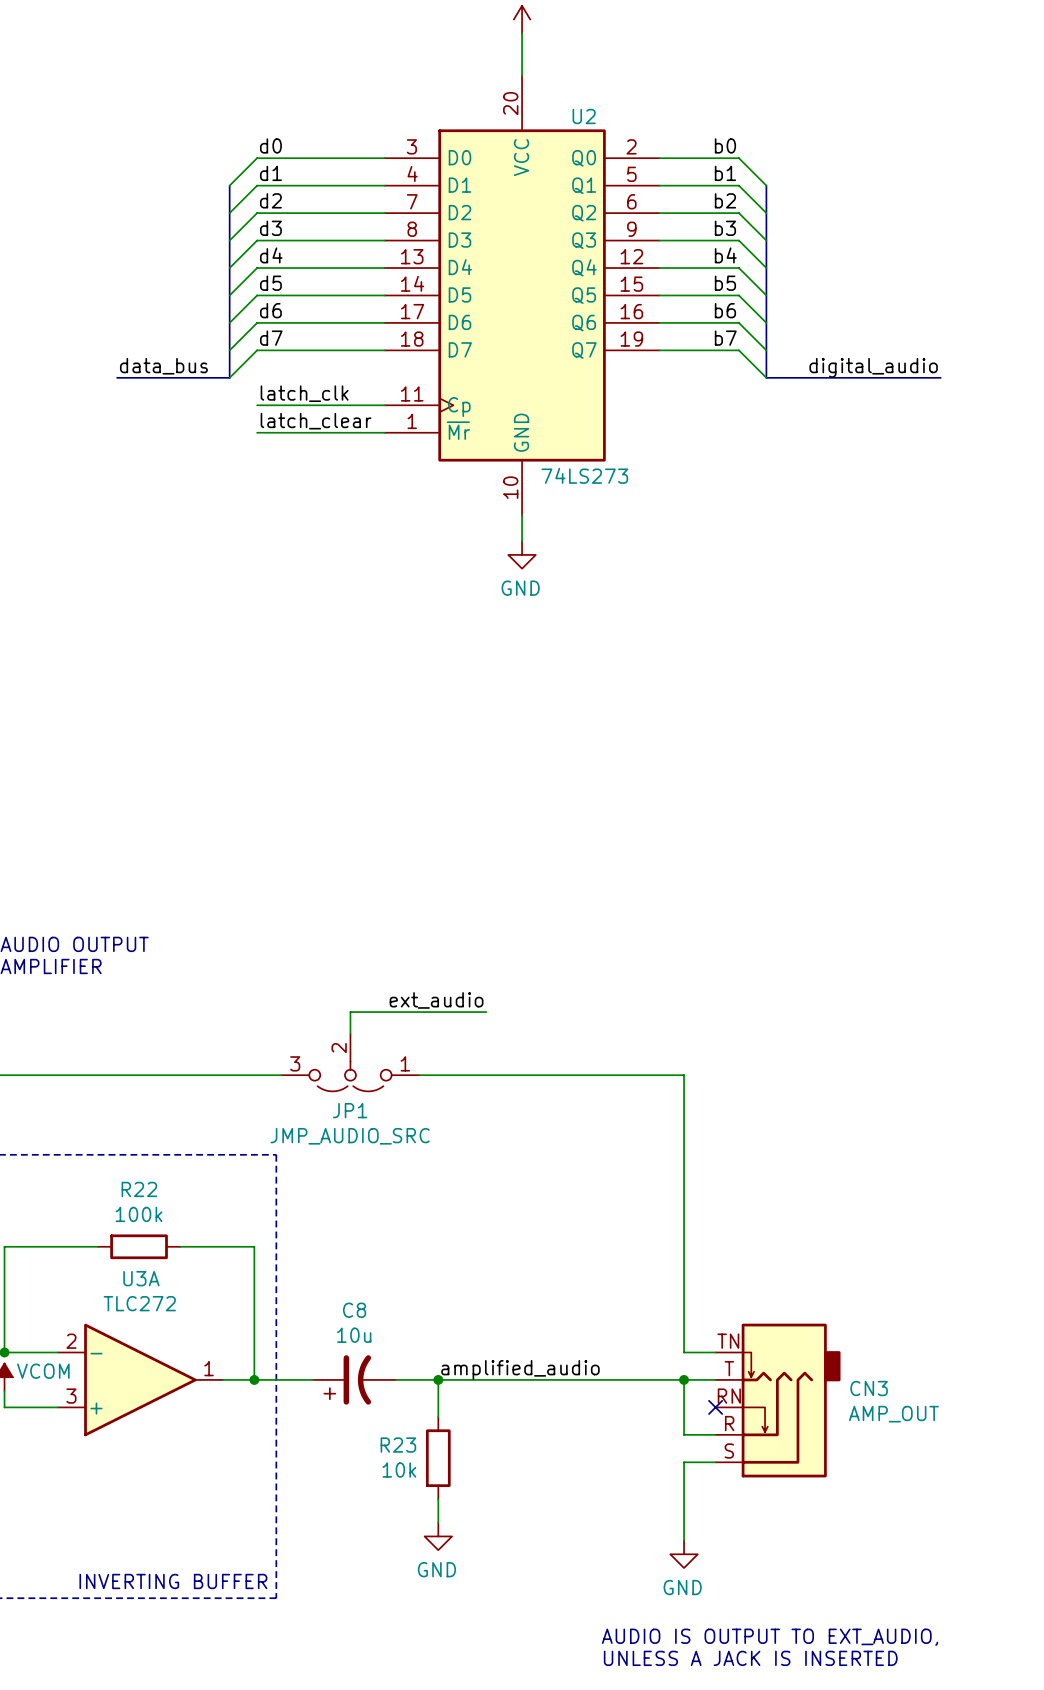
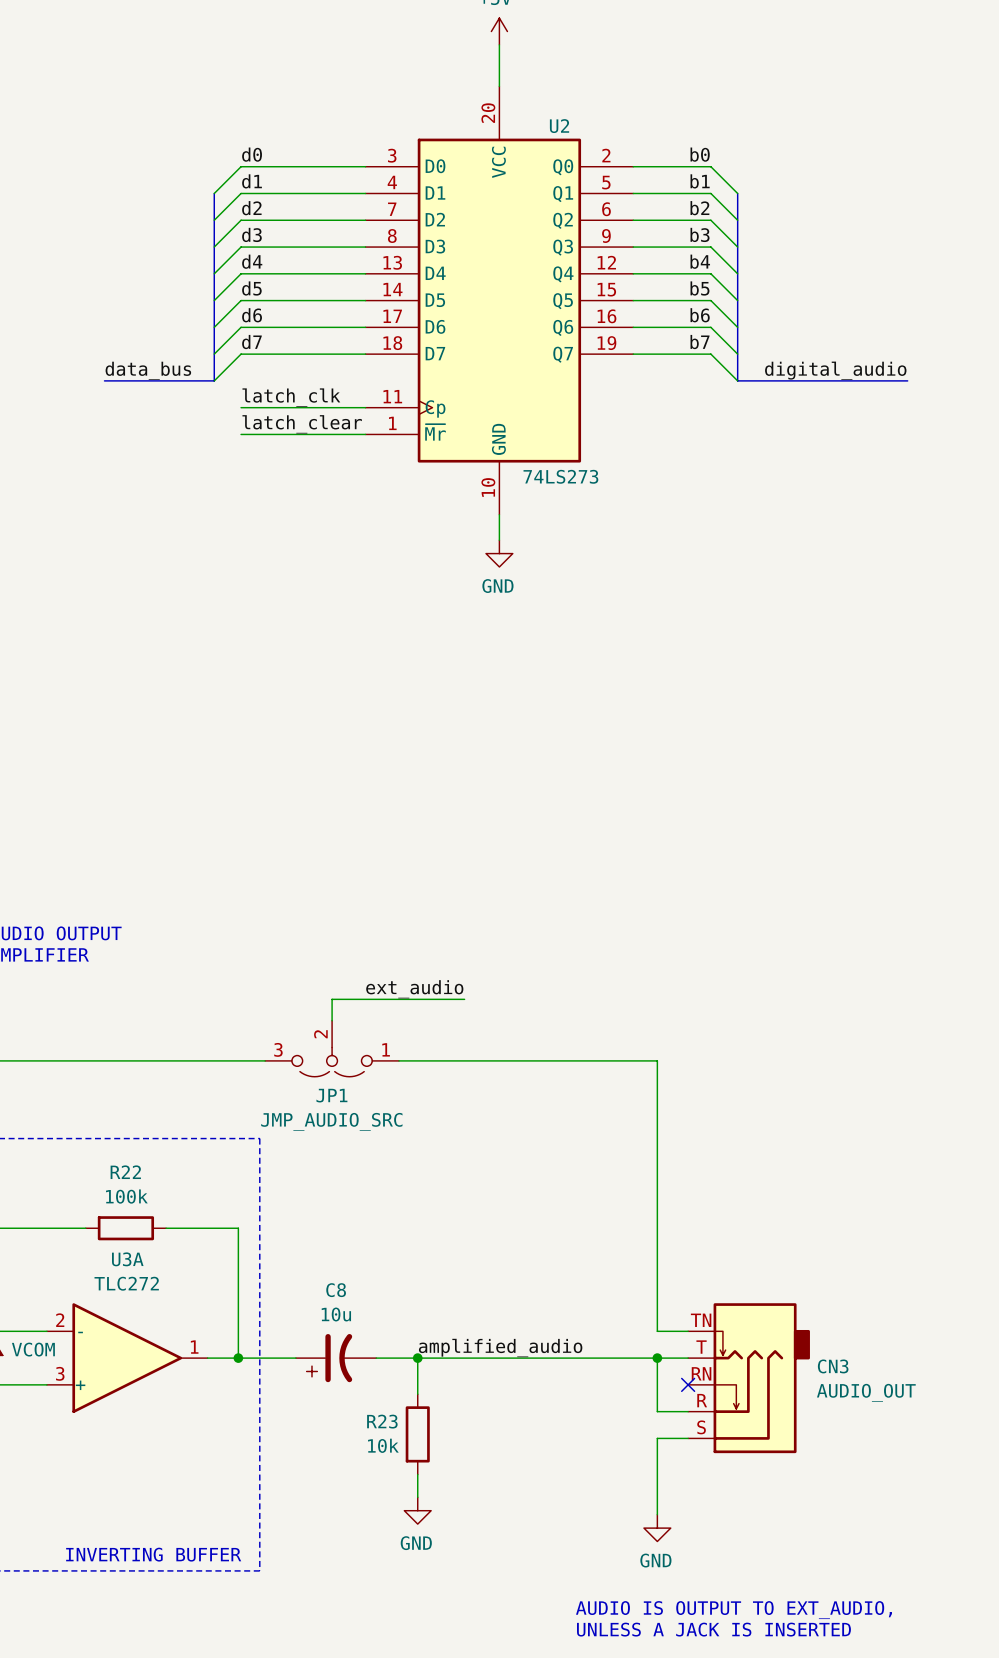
CN3 value: AMP_OUT (893, 1414) -> AUDIO_OUT (866, 1392)

